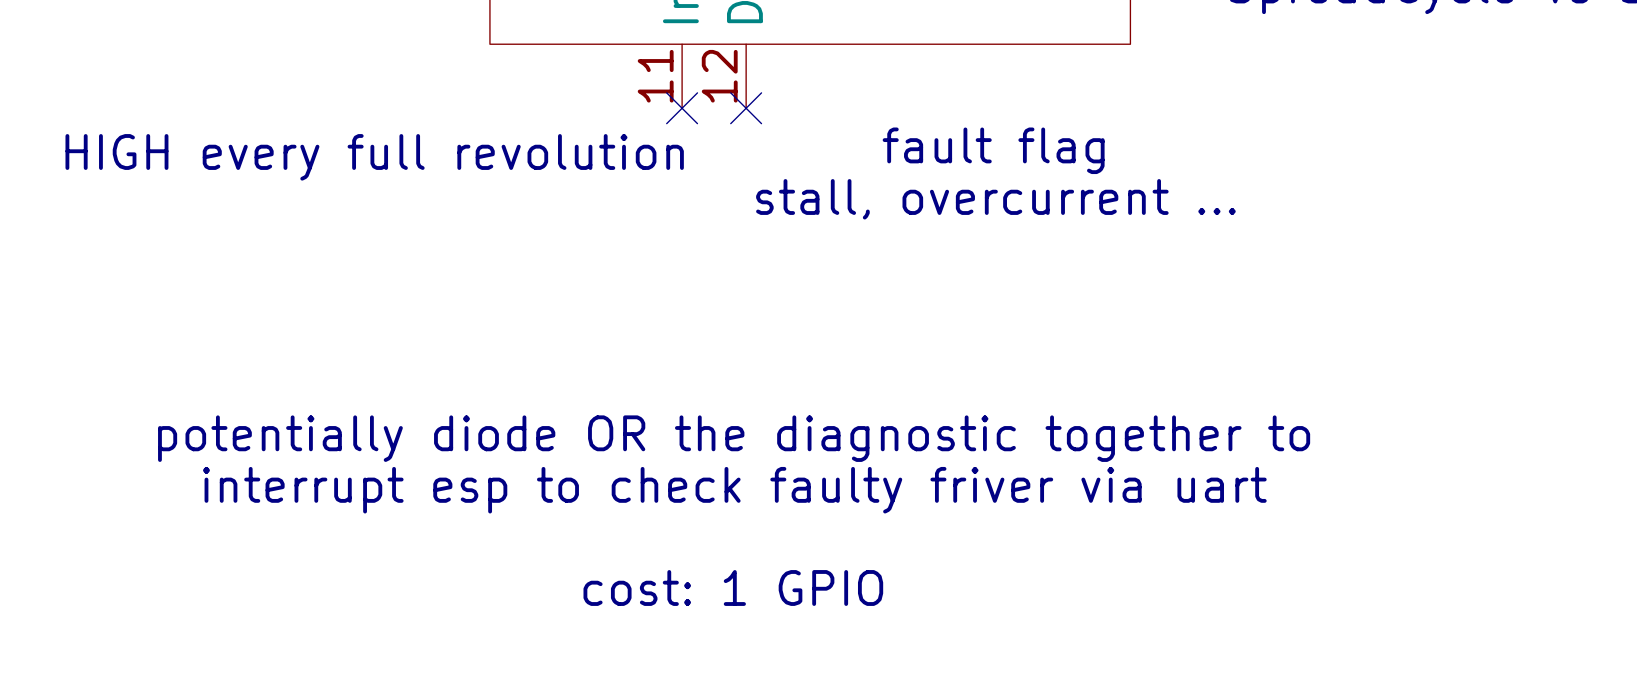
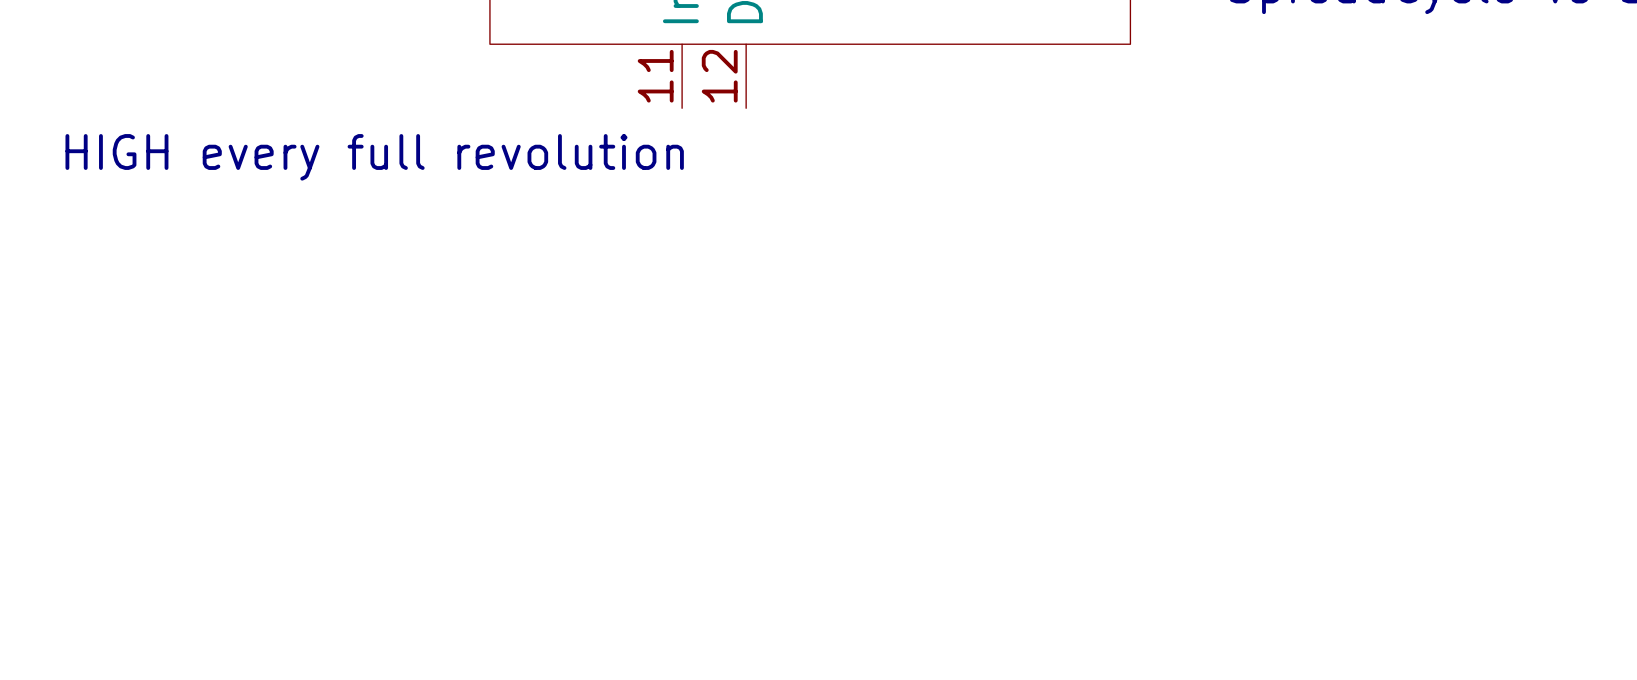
no-connect mark: (682, 108) -> none
no-connect mark: (746, 108) -> none
text: fault flag (993, 150) -> none
text: stall, overcurrent ... (995, 199) -> none
text: potentially diode OR the diagnostic together to (734, 438) -> none
text: interrupt esp to check faulty friver via uart (734, 490) -> none
text: cost: 1 GPIO (733, 587) -> none

